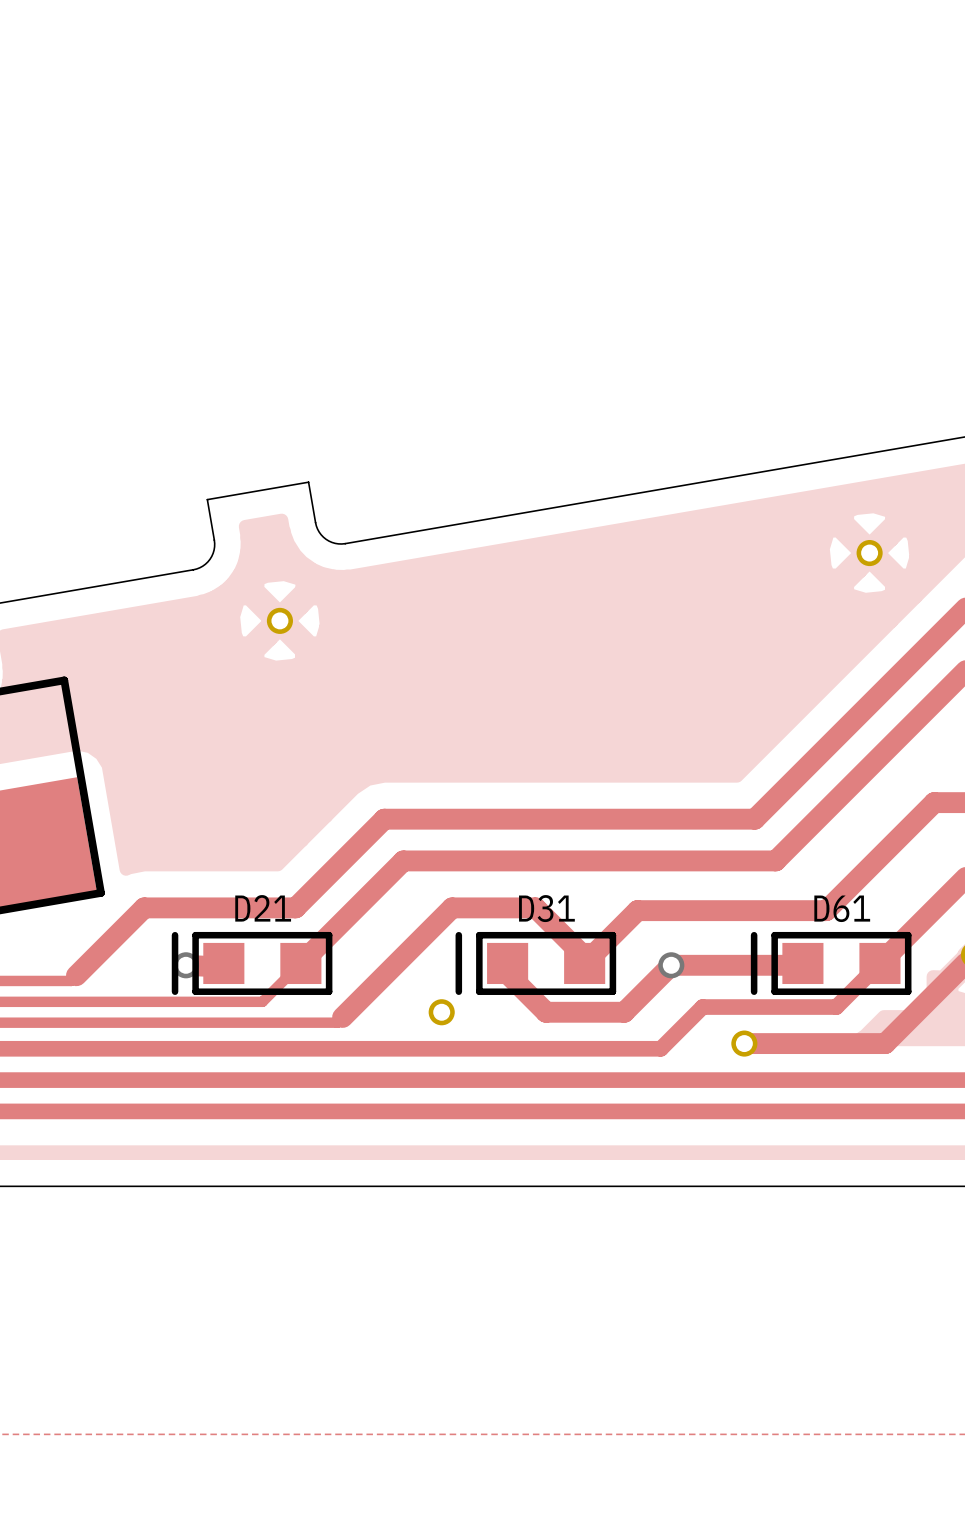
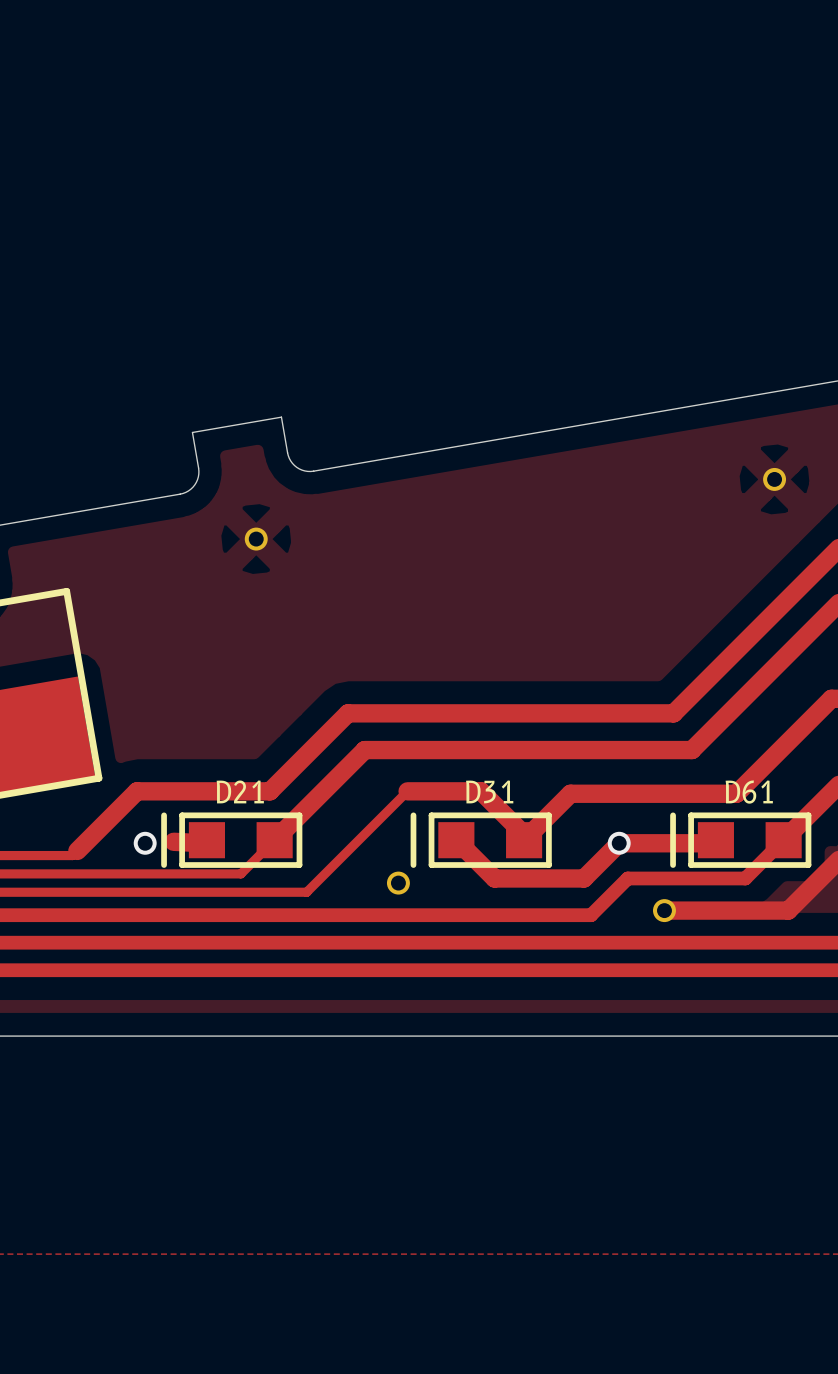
track width: thick (452, 907) (342, 1017) -> thin (407, 791) (311, 887)
track: (507, 963) (507, 973) (546, 1012) (624, 1012) (671, 965) (801, 965) -> (456, 840) (494, 878) (584, 878) (619, 843) (712, 843)
via position: (186, 965) -> (145, 843)
via position: (671, 965) -> (619, 843)

